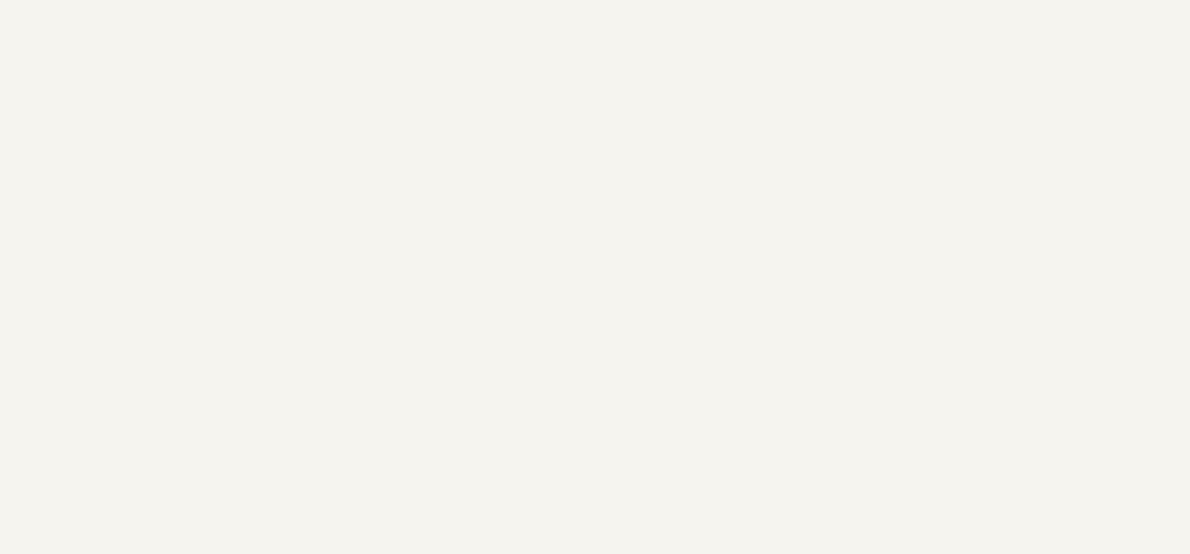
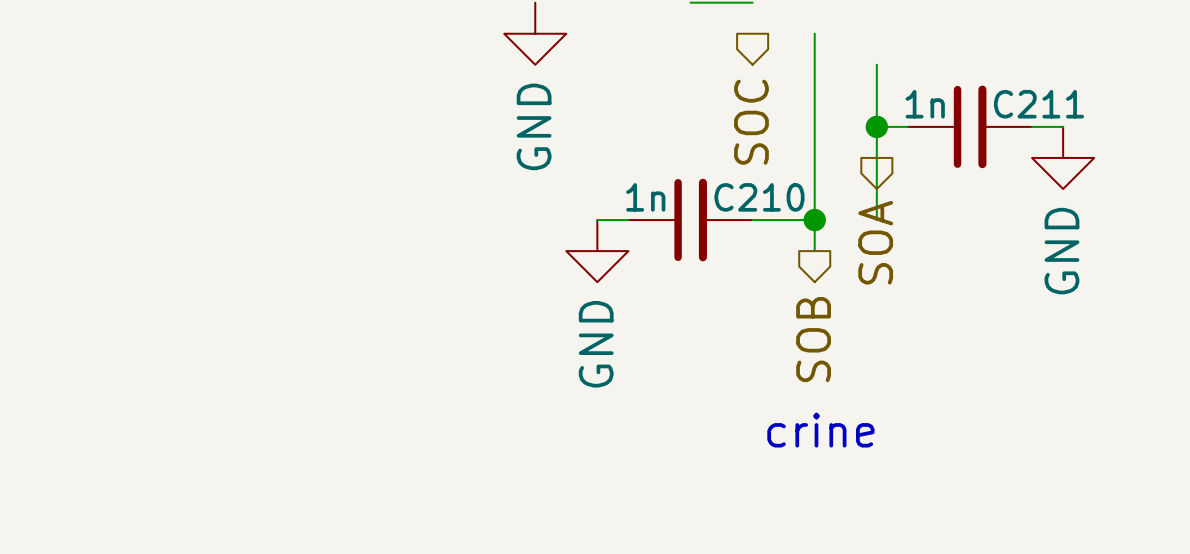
wire: none -> (690, 2) (752, 2)
power symbol: none -> GND (535, 33)
wire: none -> (814, 33) (814, 251)
wire: none -> (876, 64) (876, 220)
hierarchical label: none -> SOC (751, 122)
wire: none -> (876, 126) (907, 126)
junction: none -> (876, 126)
C211: none -> 1n (969, 126)
wire: none -> (1032, 126) (1063, 126)
power symbol: none -> GND (1063, 157)
wire: none -> (597, 220) (628, 220)
C210: none -> 1n (690, 220)
wire: none -> (752, 220) (814, 220)
junction: none -> (814, 220)
hierarchical label: none -> SOA (875, 242)
power symbol: none -> GND (597, 251)
hierarchical label: none -> SOB (813, 339)
text: none -> crine (820, 430)

